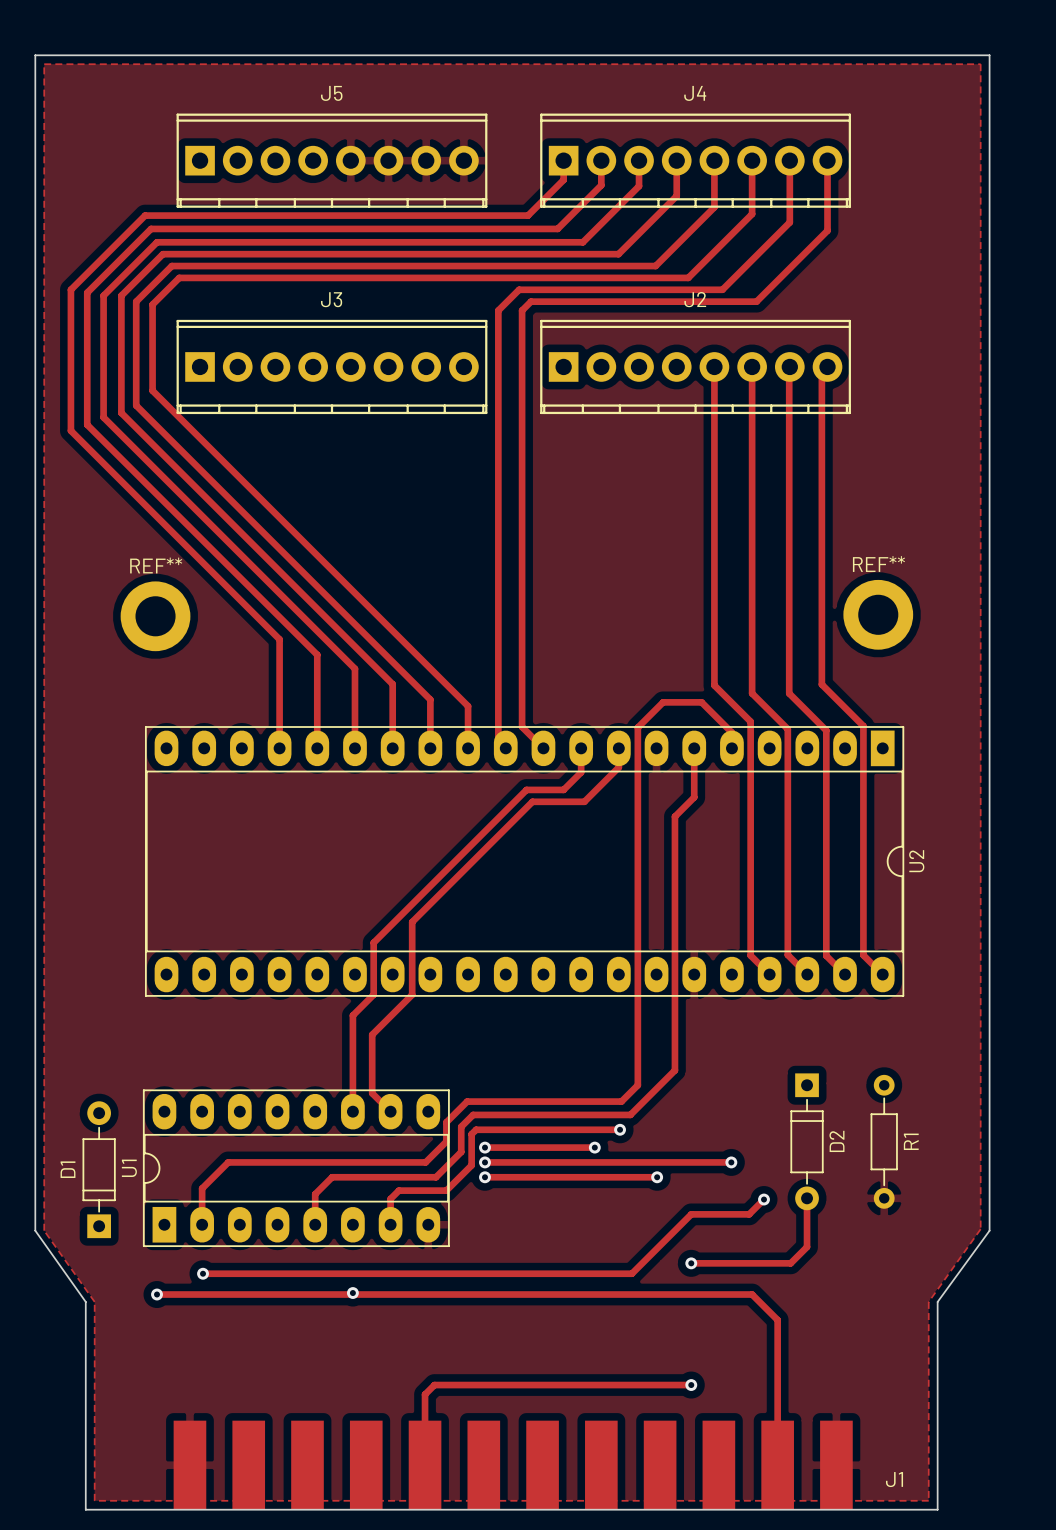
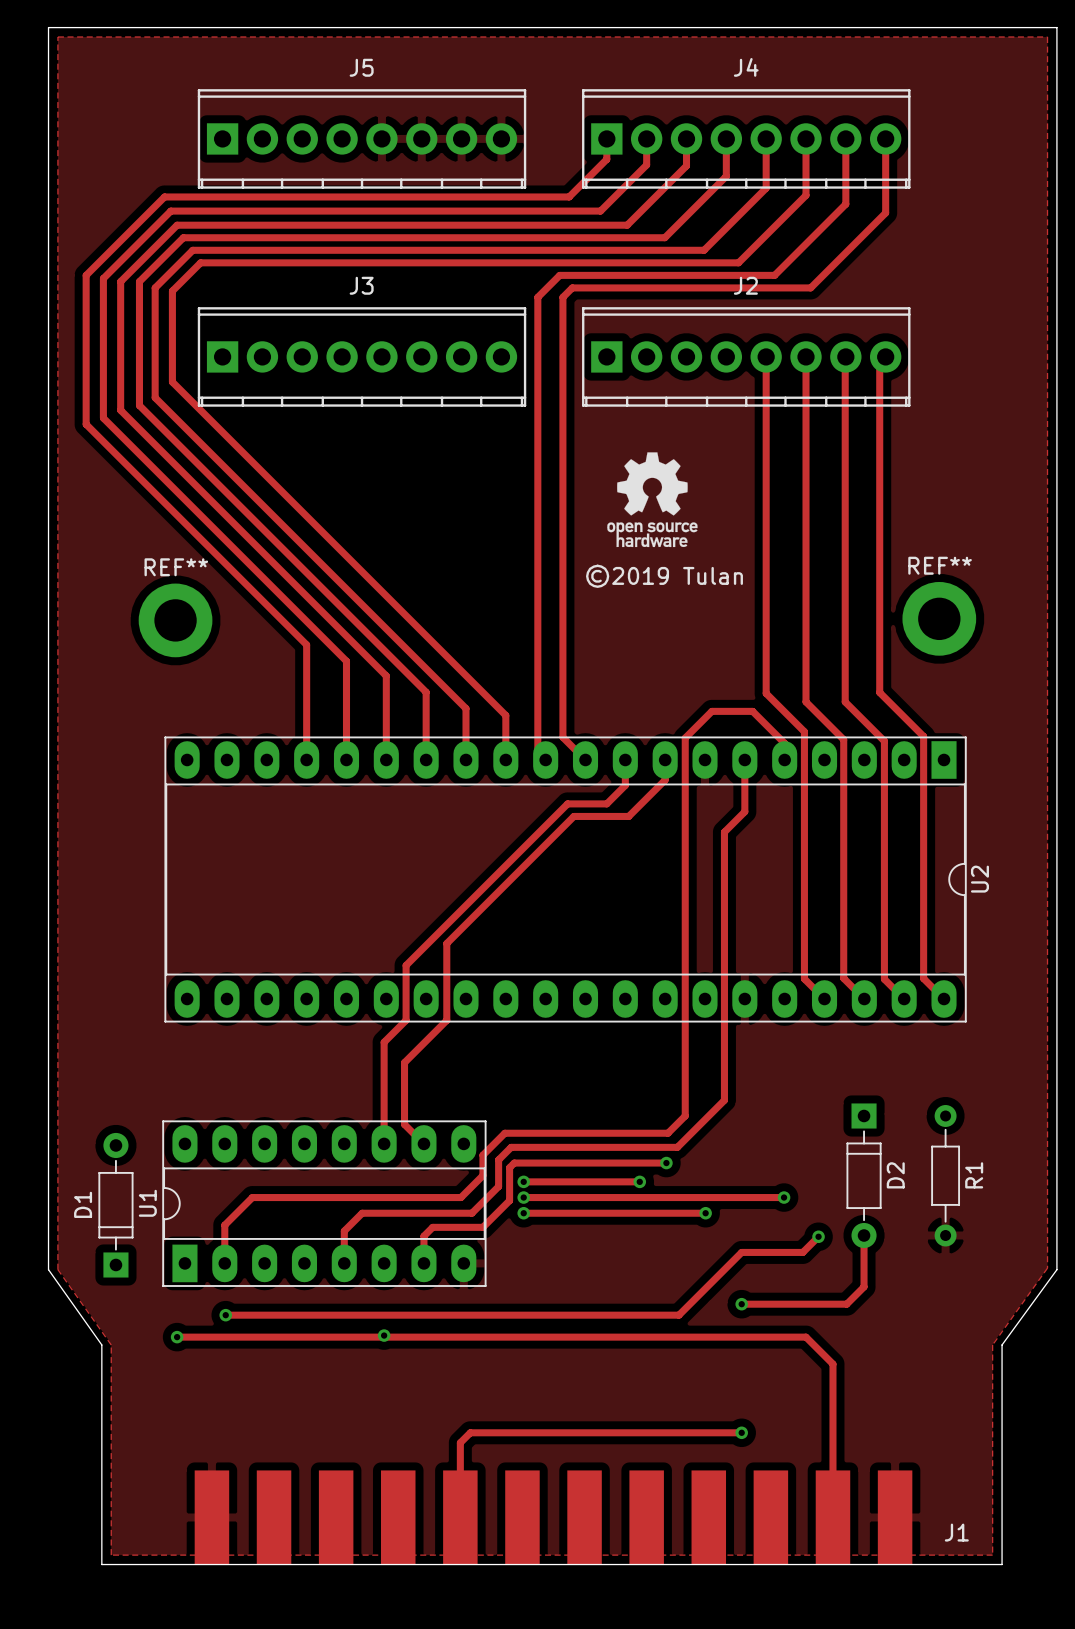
drawing: none -> [607, 452, 698, 548]
text: none -> ©2019 Tulan (664, 576)

